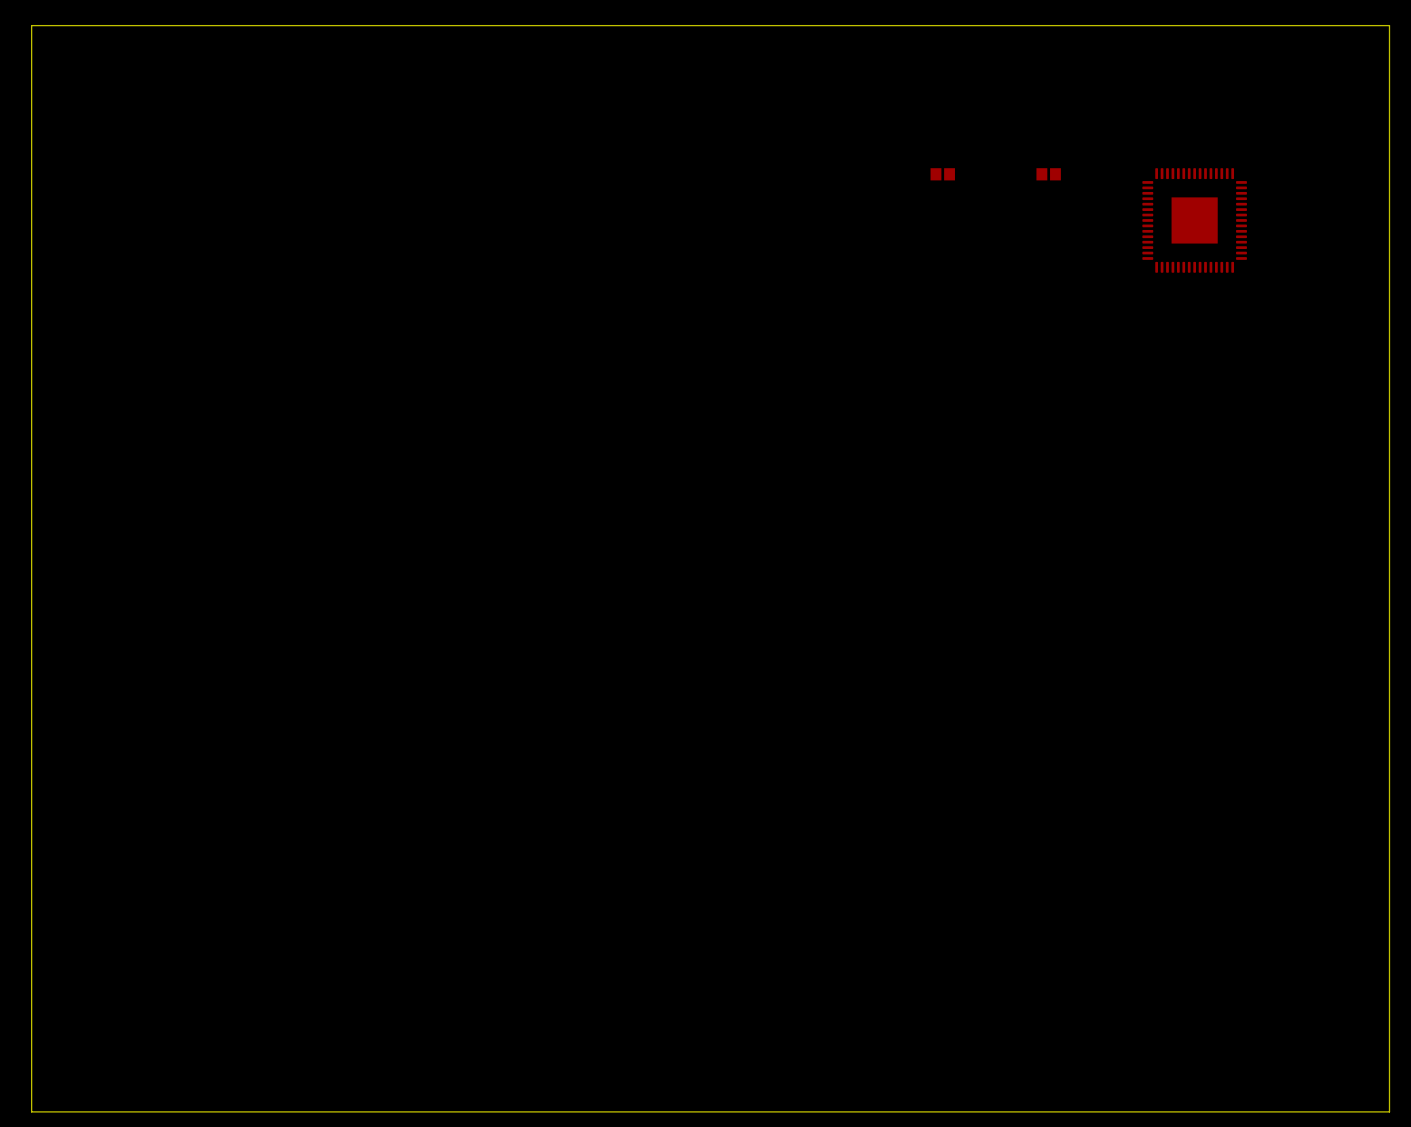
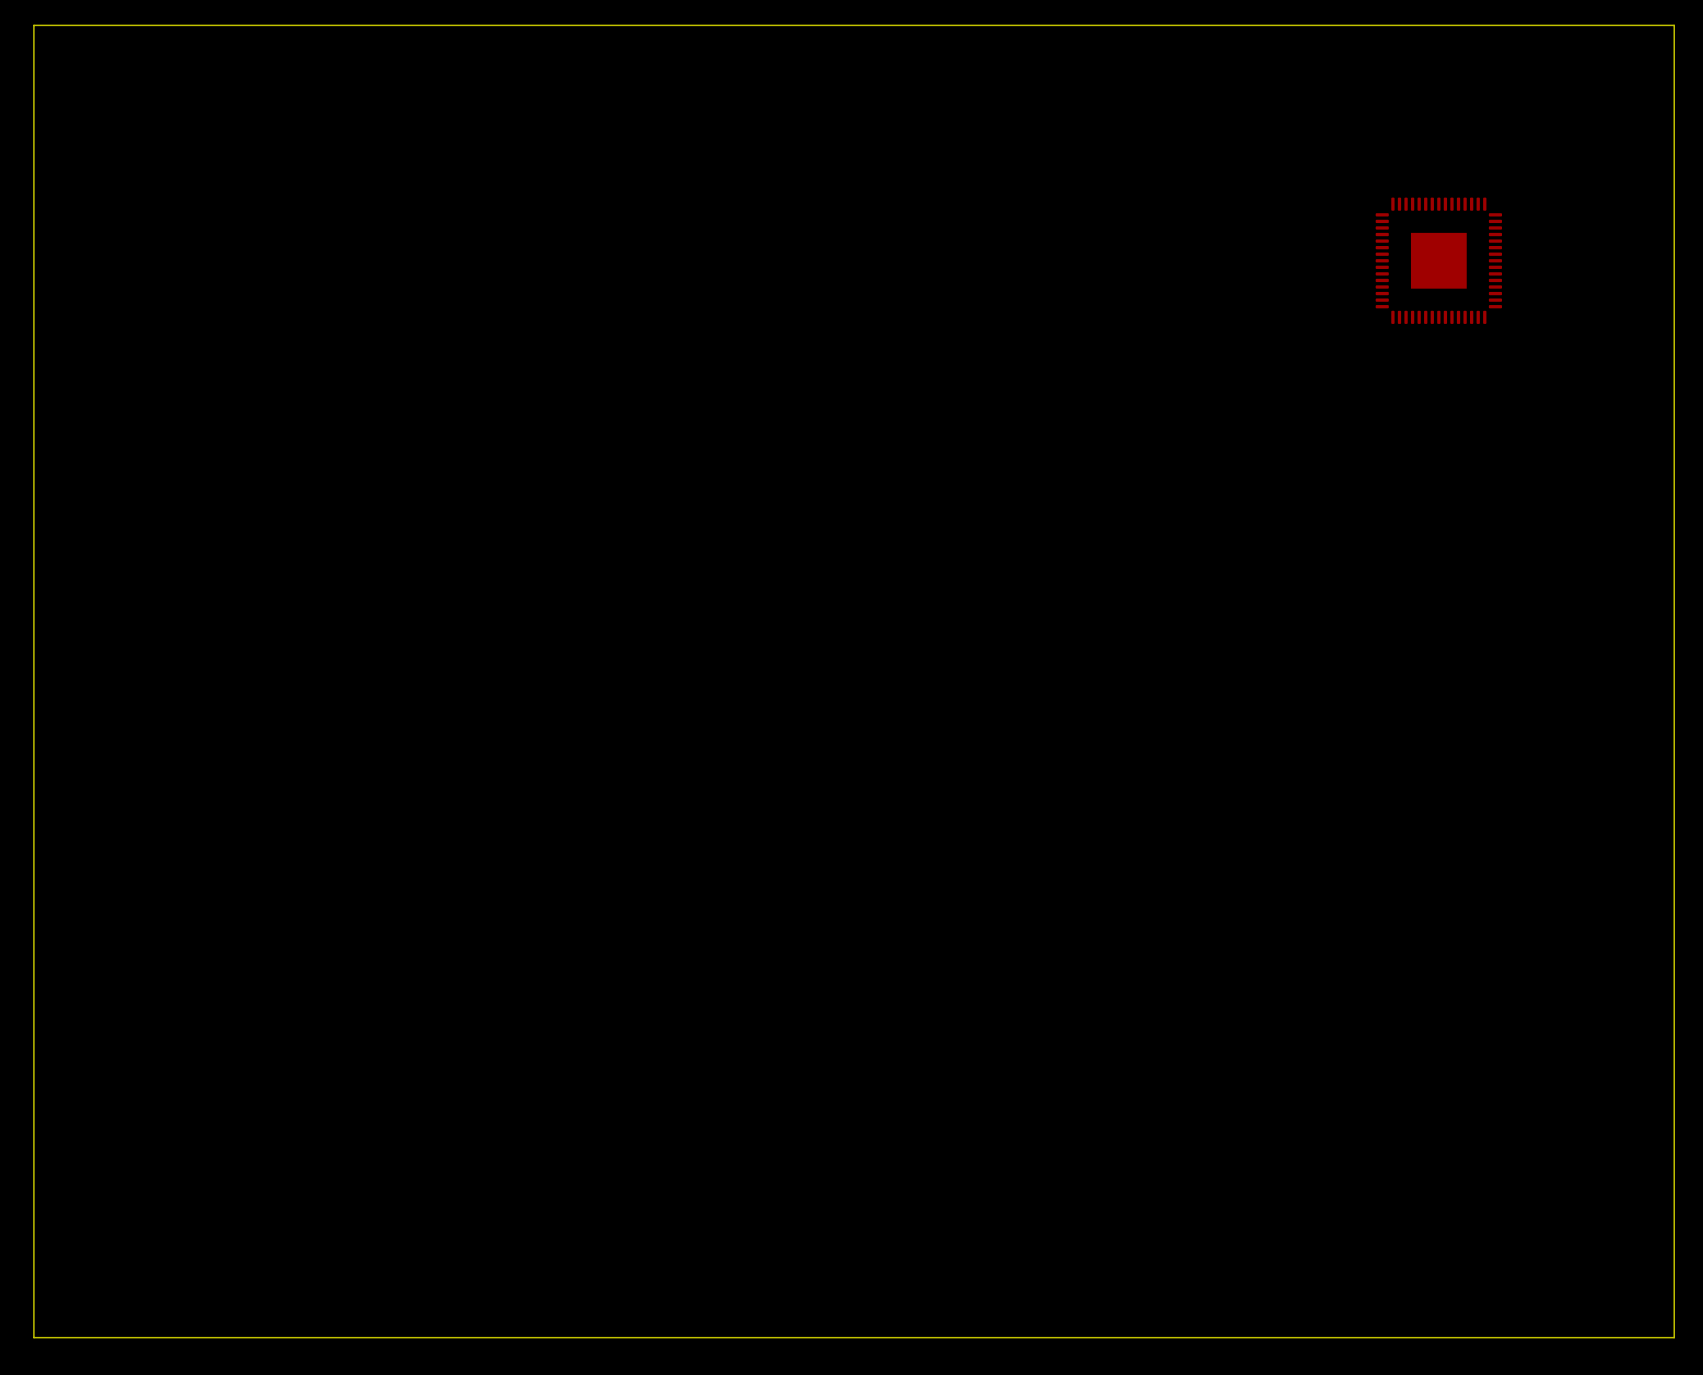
part: (942, 174) -> none
part: (1048, 174) -> none

